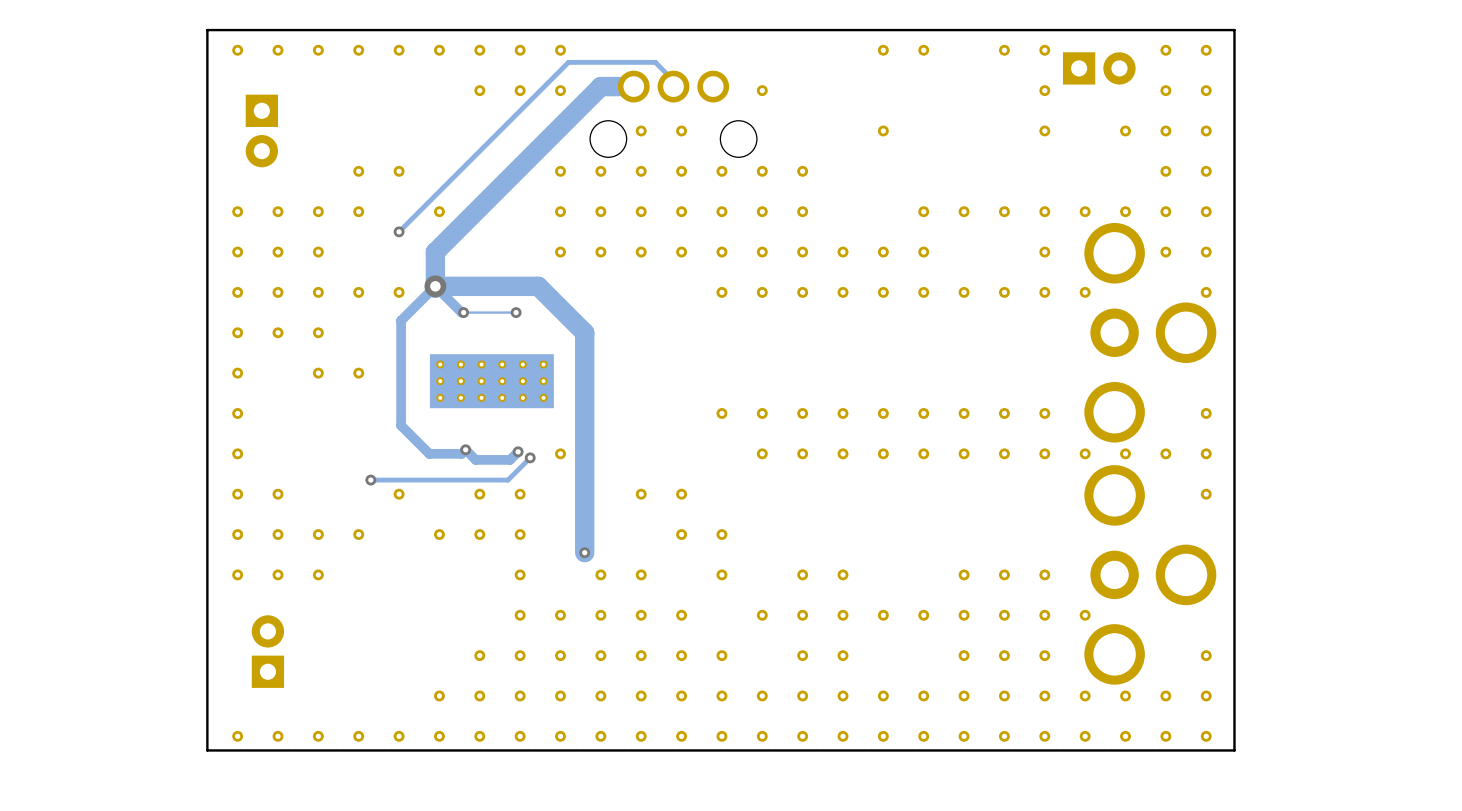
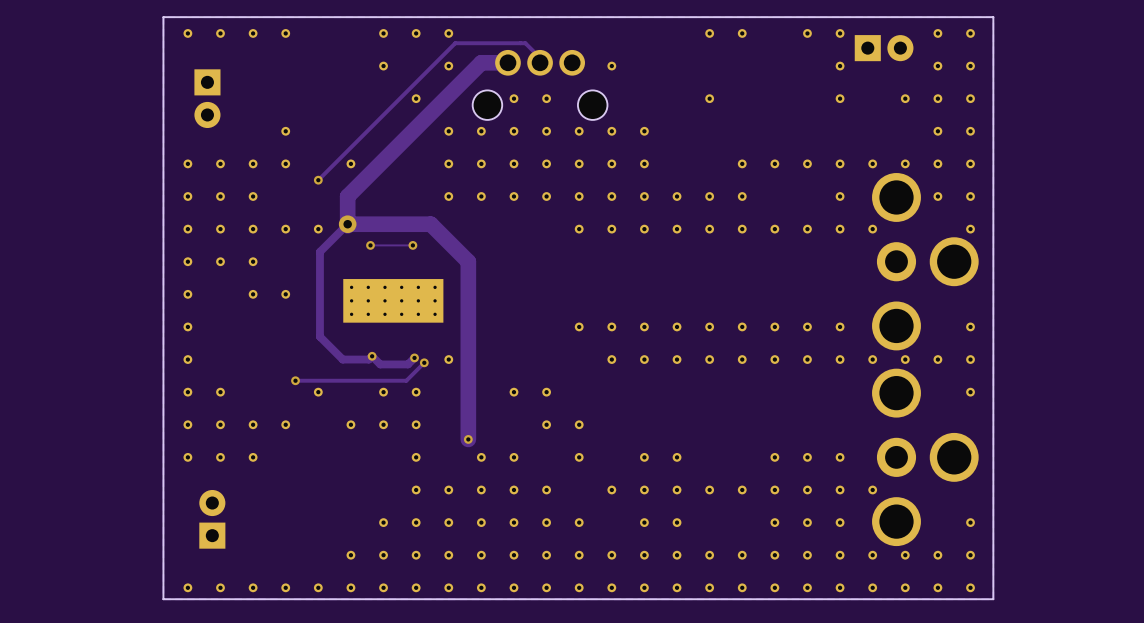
part: (399, 50) -> none
part: (439, 50) -> none
part position: (520, 90) -> (416, 98)
part: (399, 171) -> none
track: (435, 286) (463, 312) -> none

